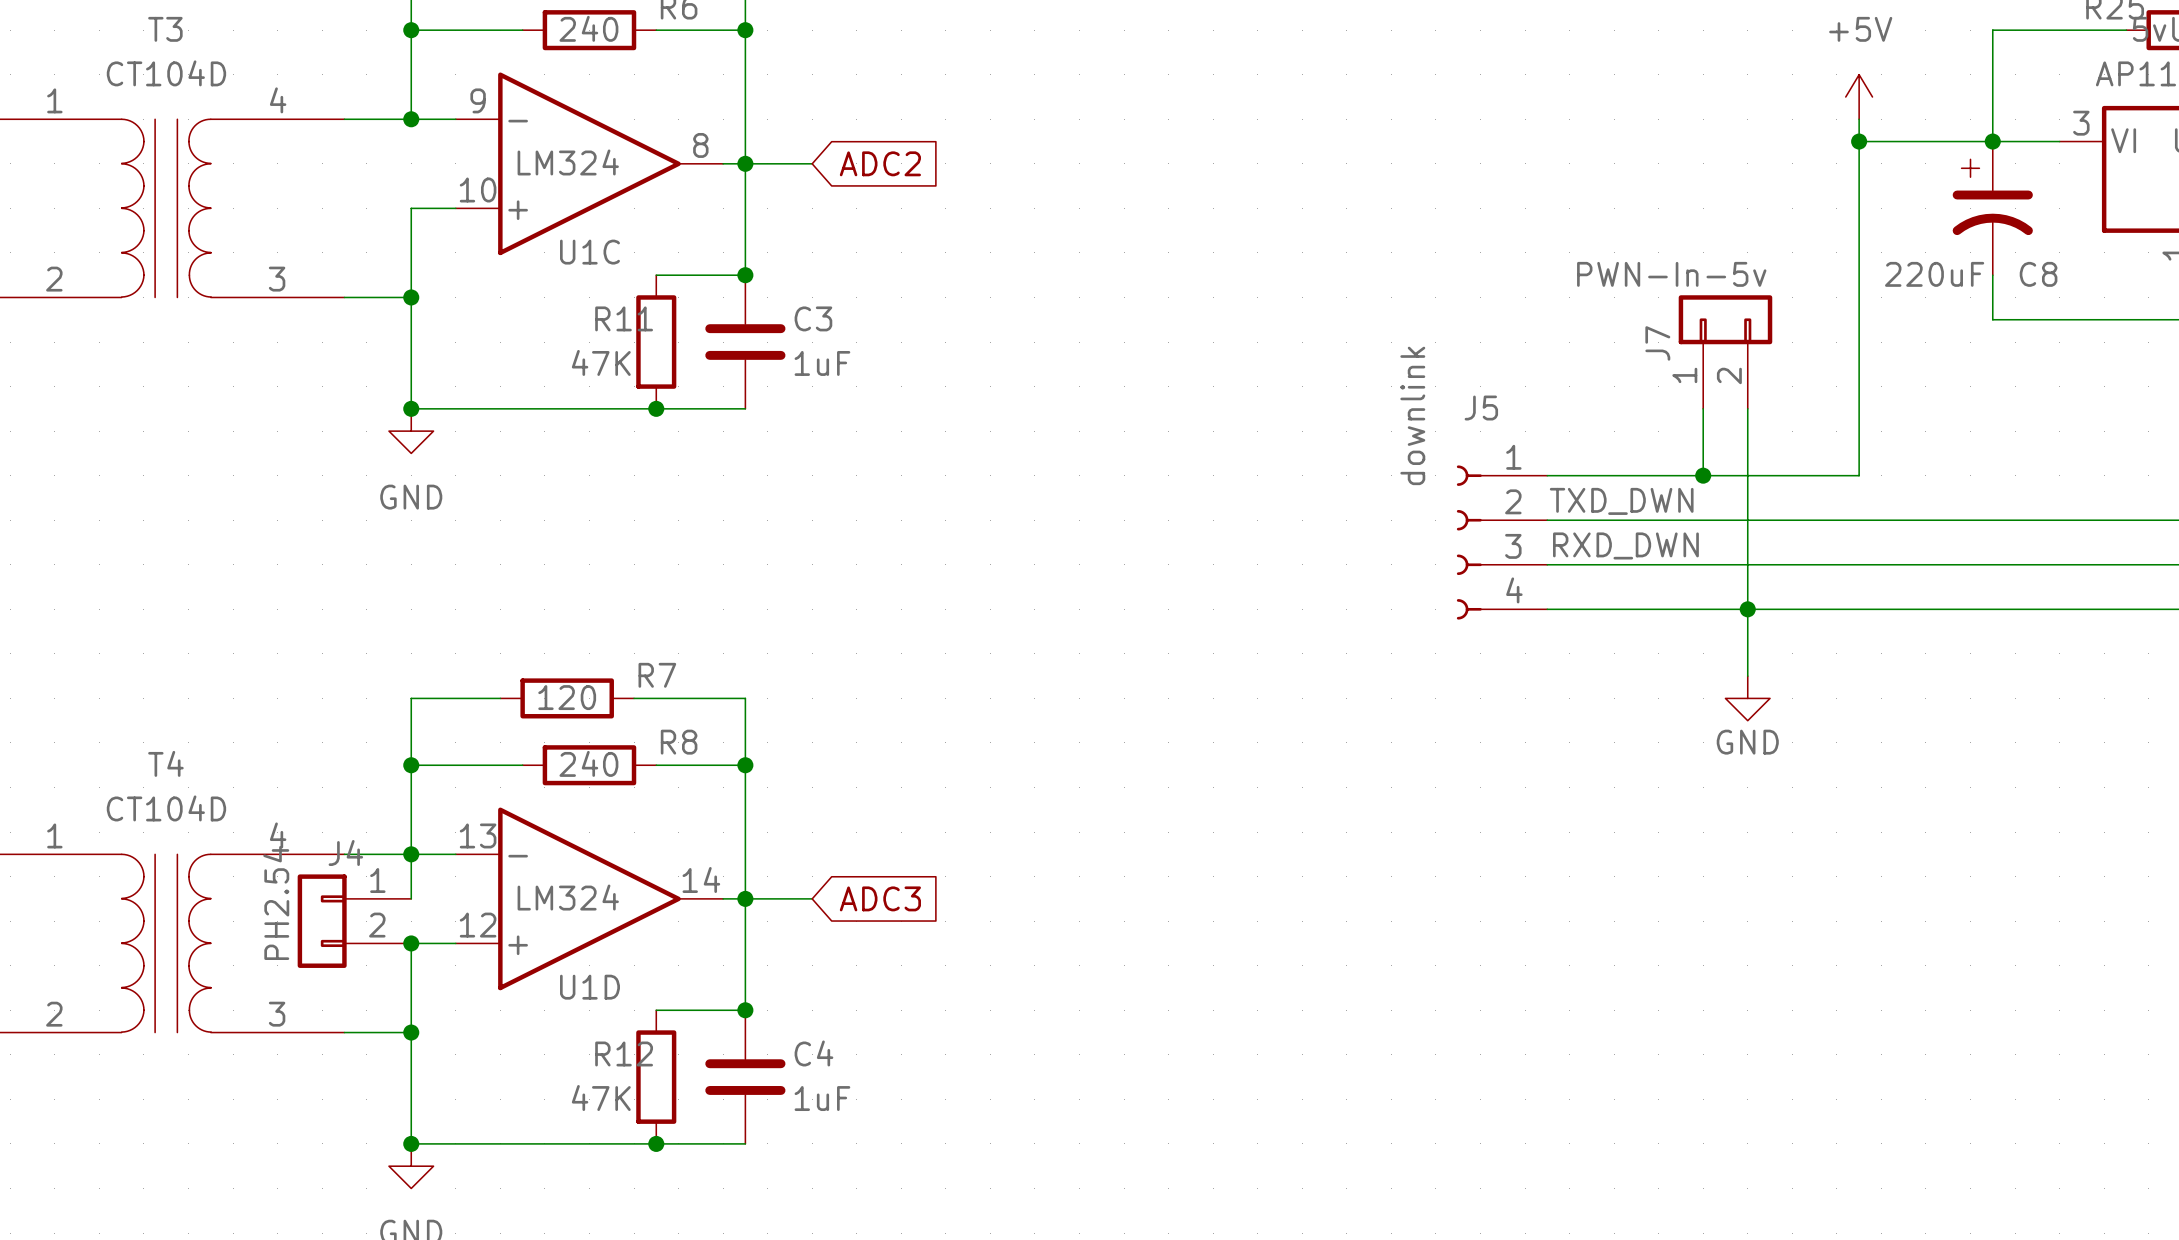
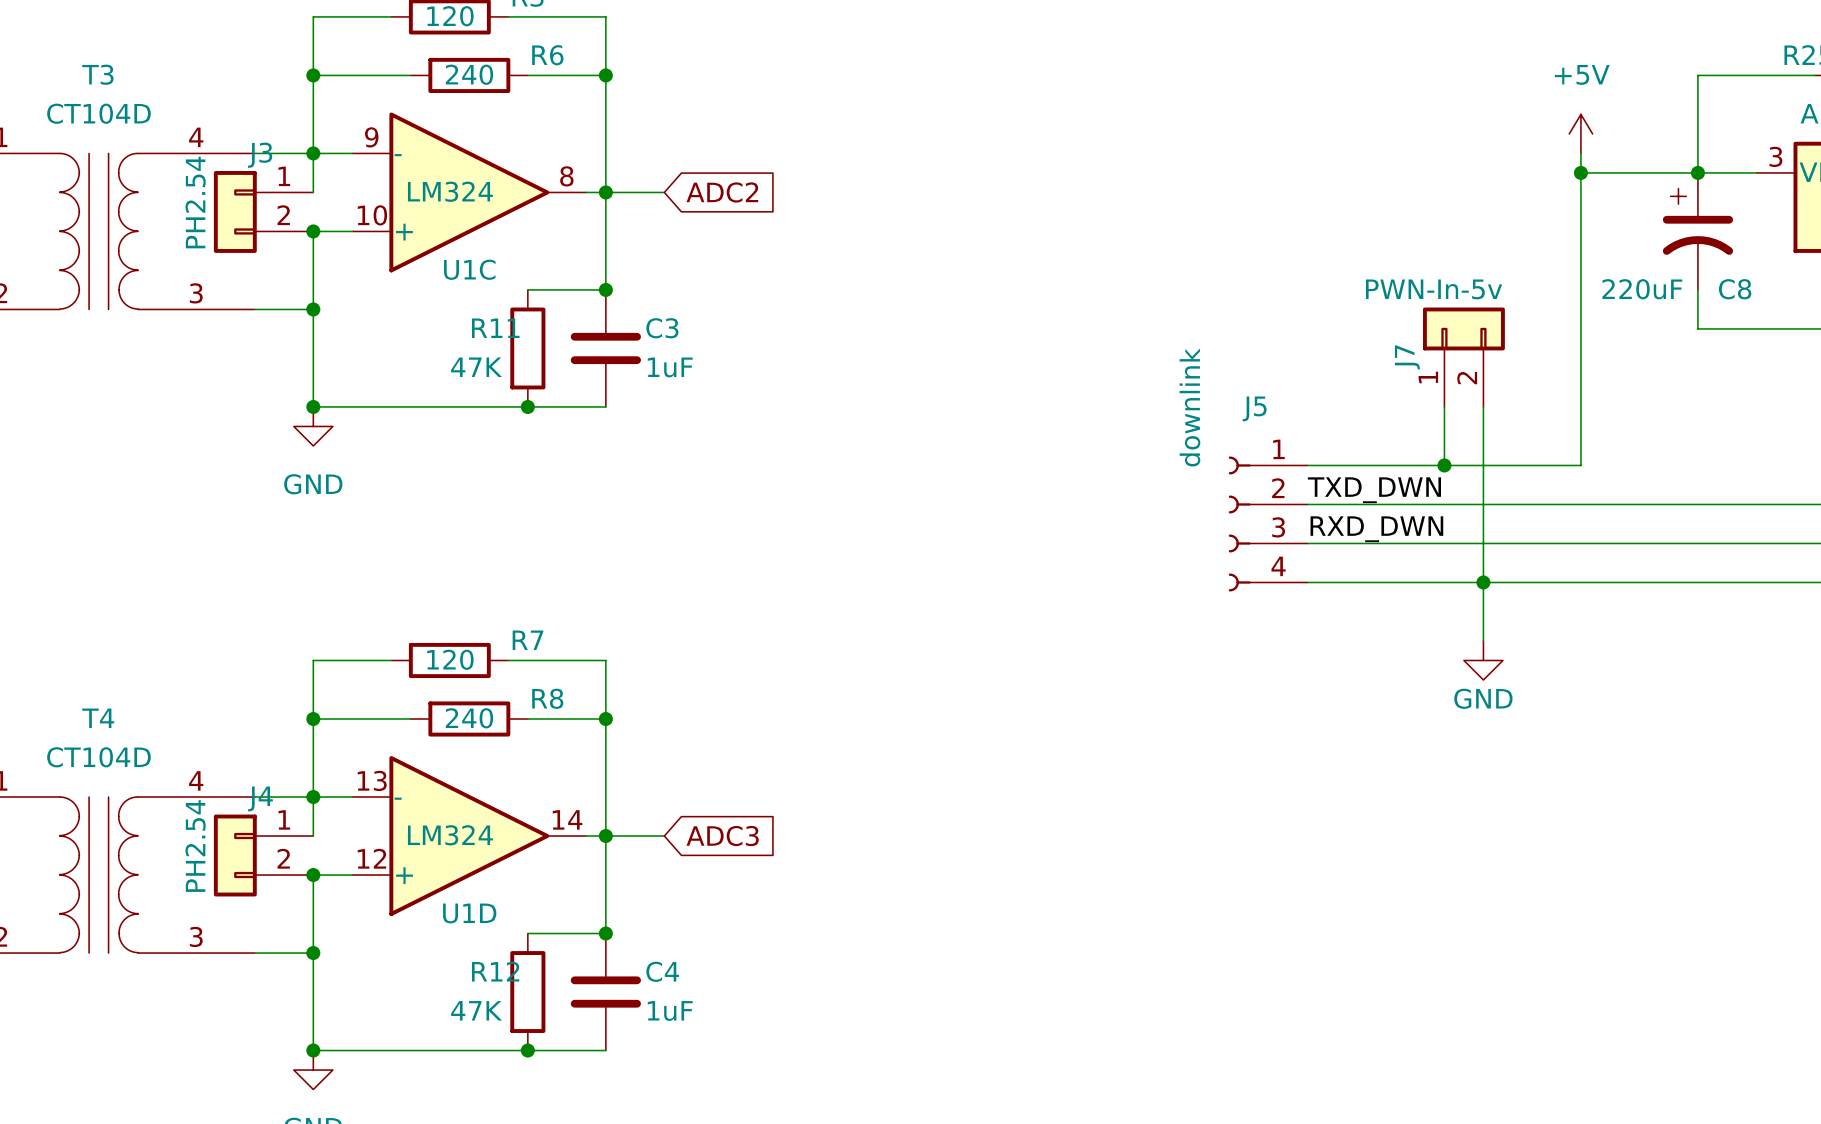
wire: none -> (313, 153) (313, 192)
J3: none -> PH2.54 (263, 211)
junction: none -> (313, 231)

